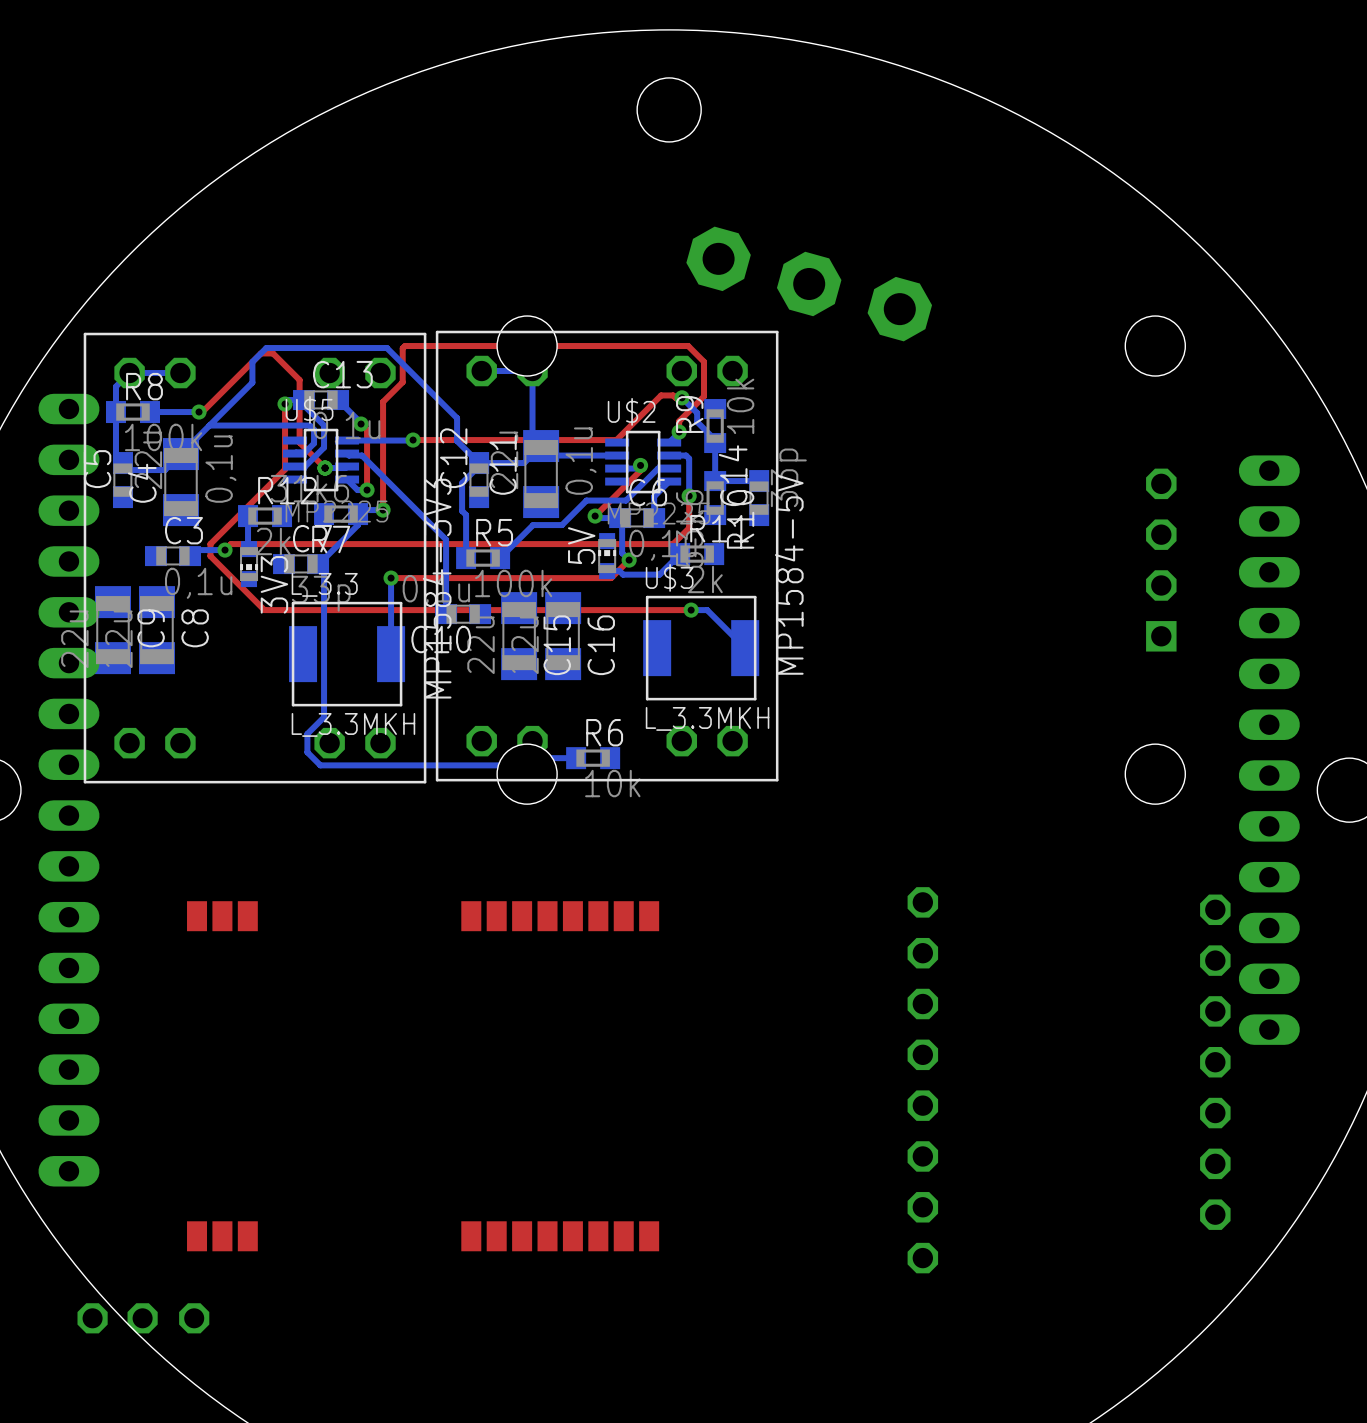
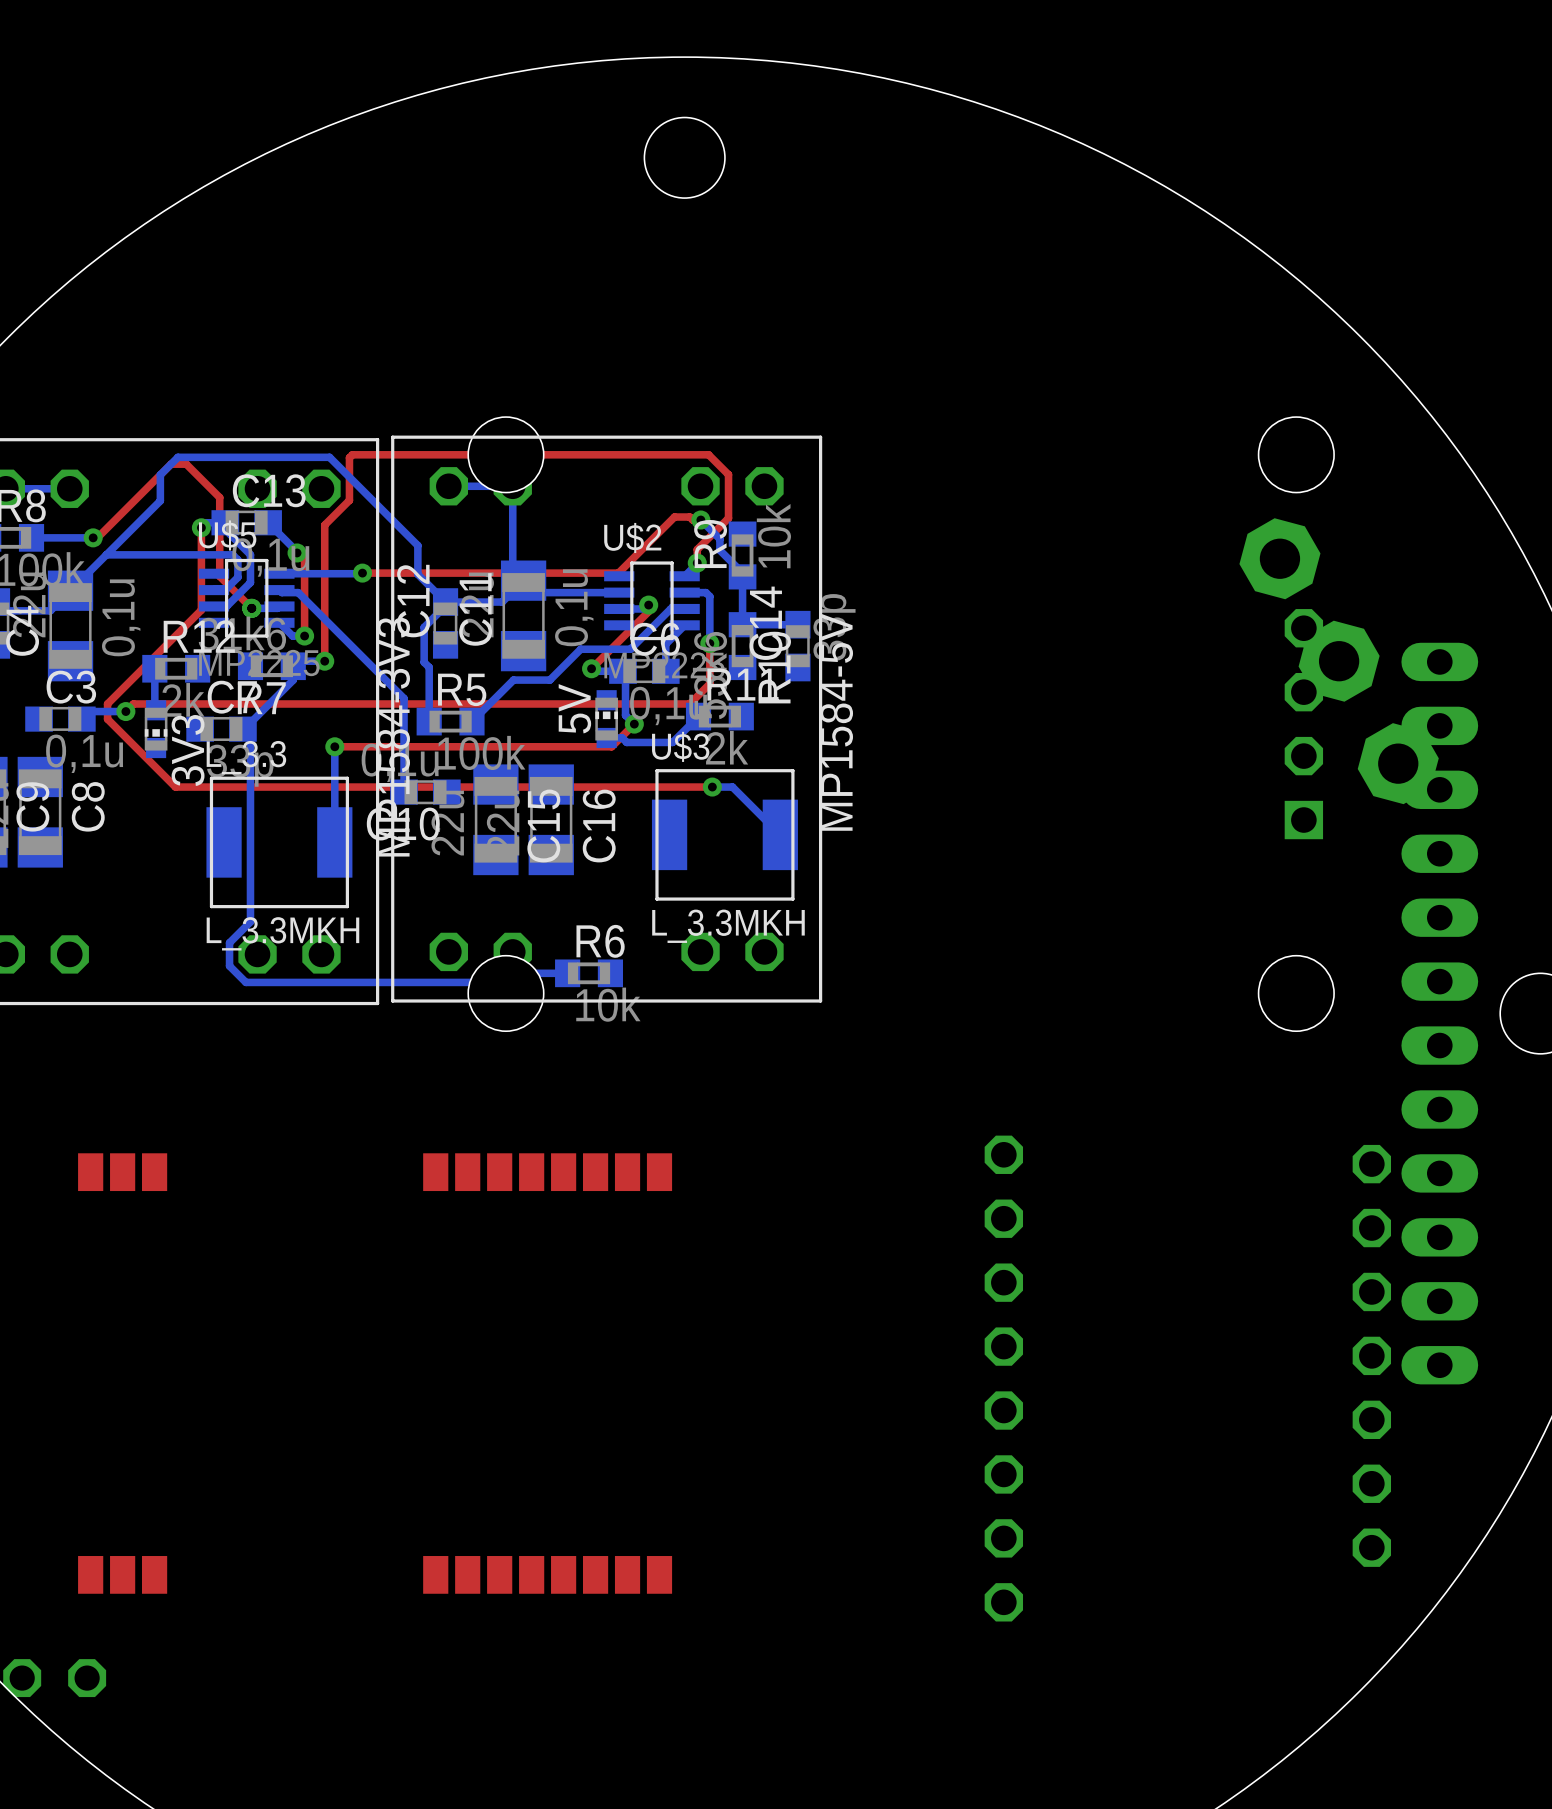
part: (809, 283) -> none
part: none -> (1339, 661)
part position: (1269, 750) -> (1439, 1013)

